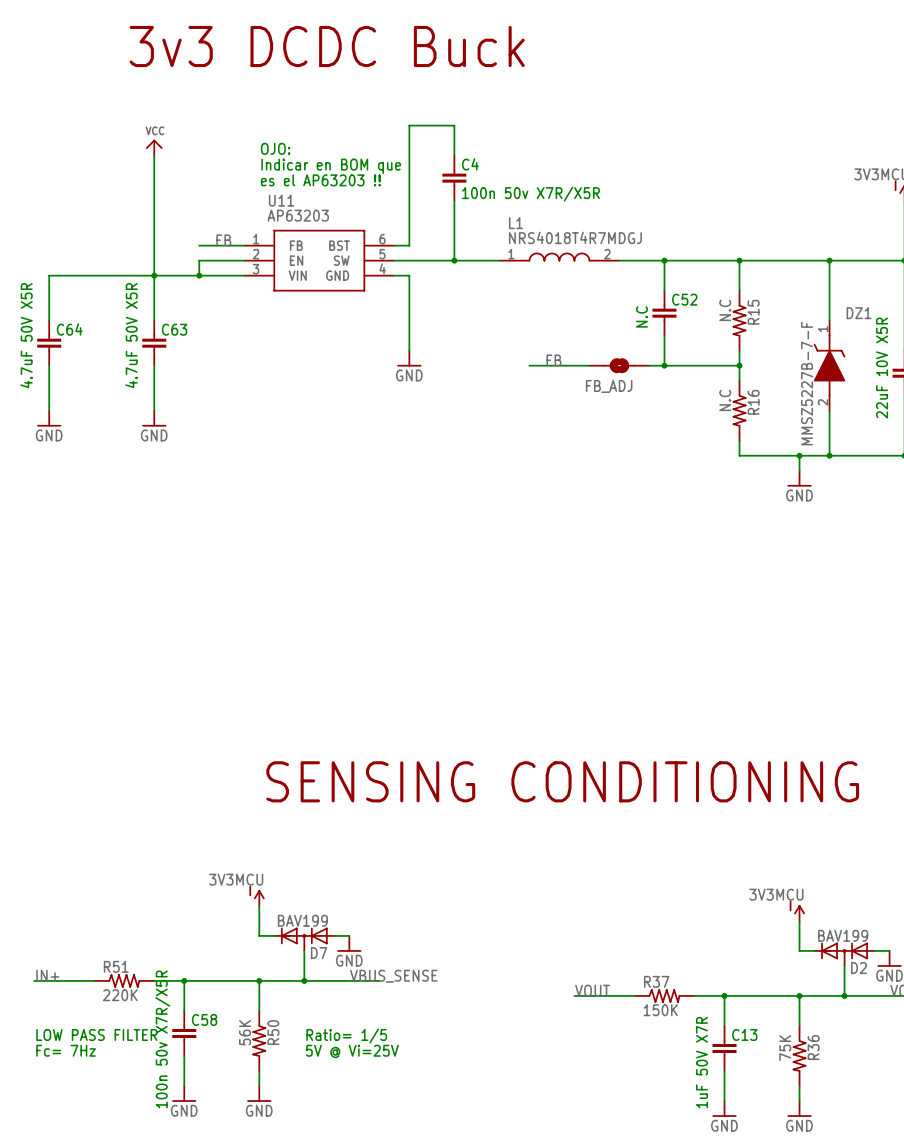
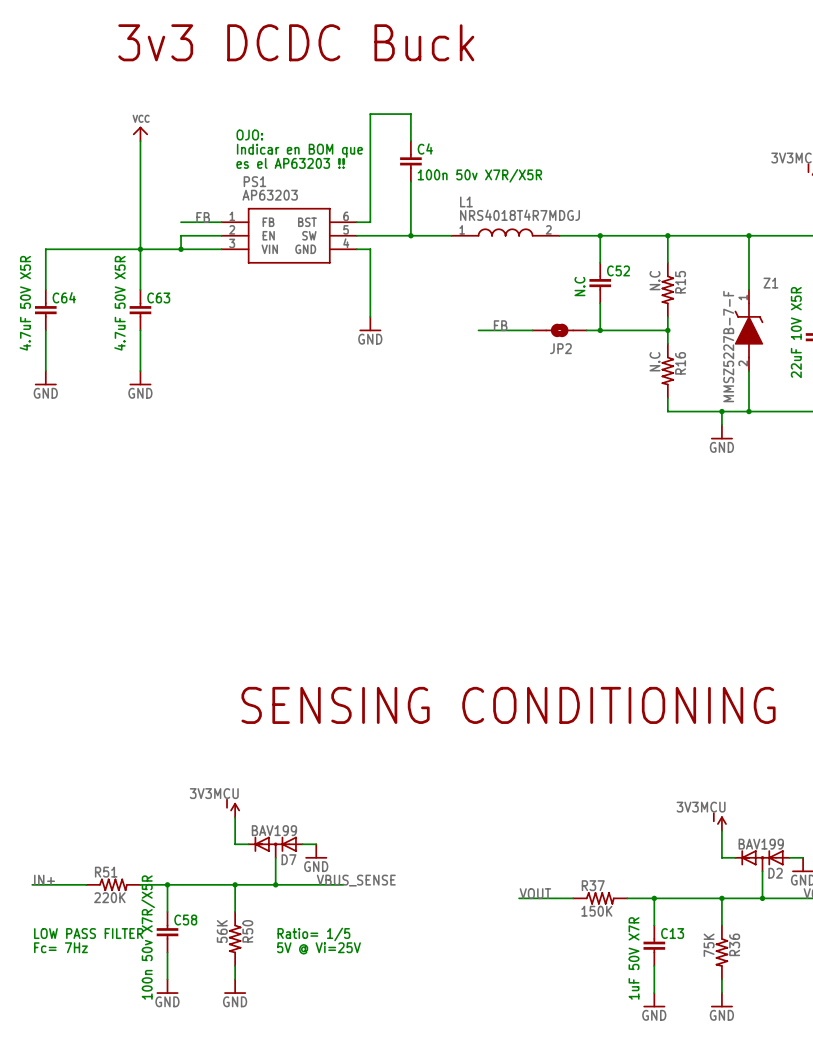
U11 name: U11 (281, 200) -> PS1 (254, 181)
DZ1 name: DZ1 (859, 313) -> Z1 (770, 283)
FB_ADJ name: FB_ADJ (609, 386) -> JP2 (560, 348)

